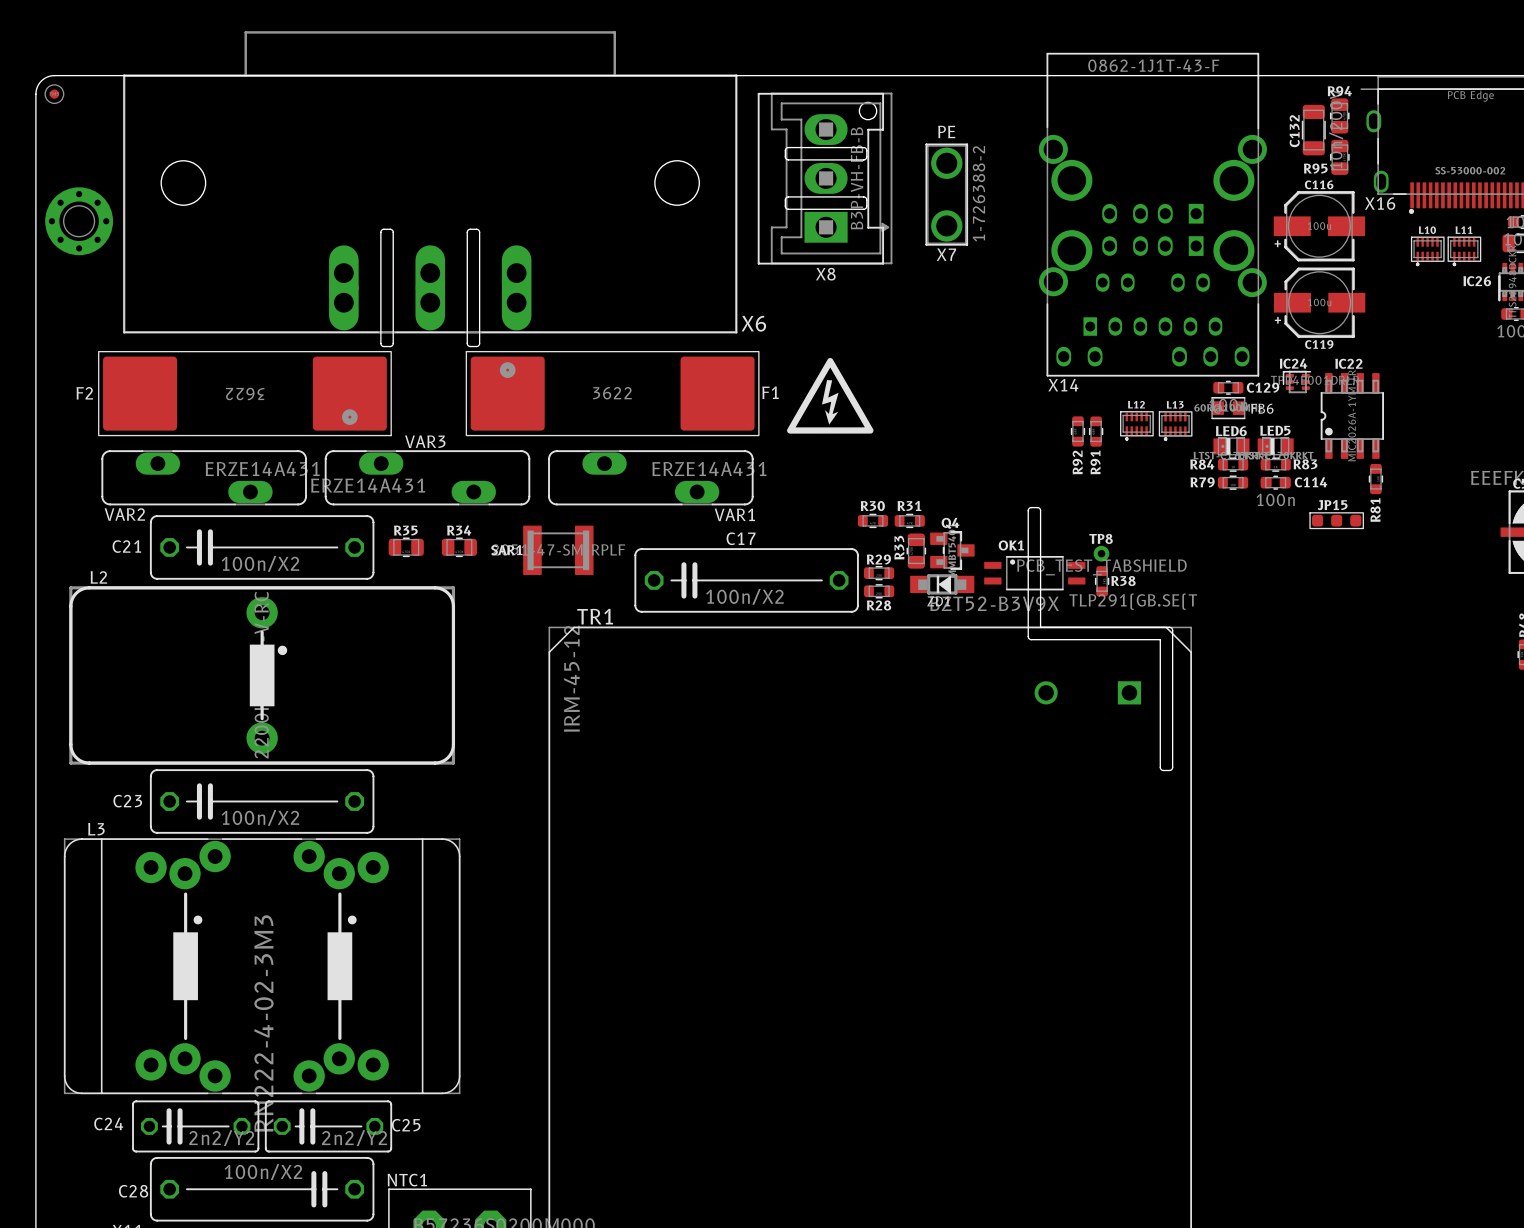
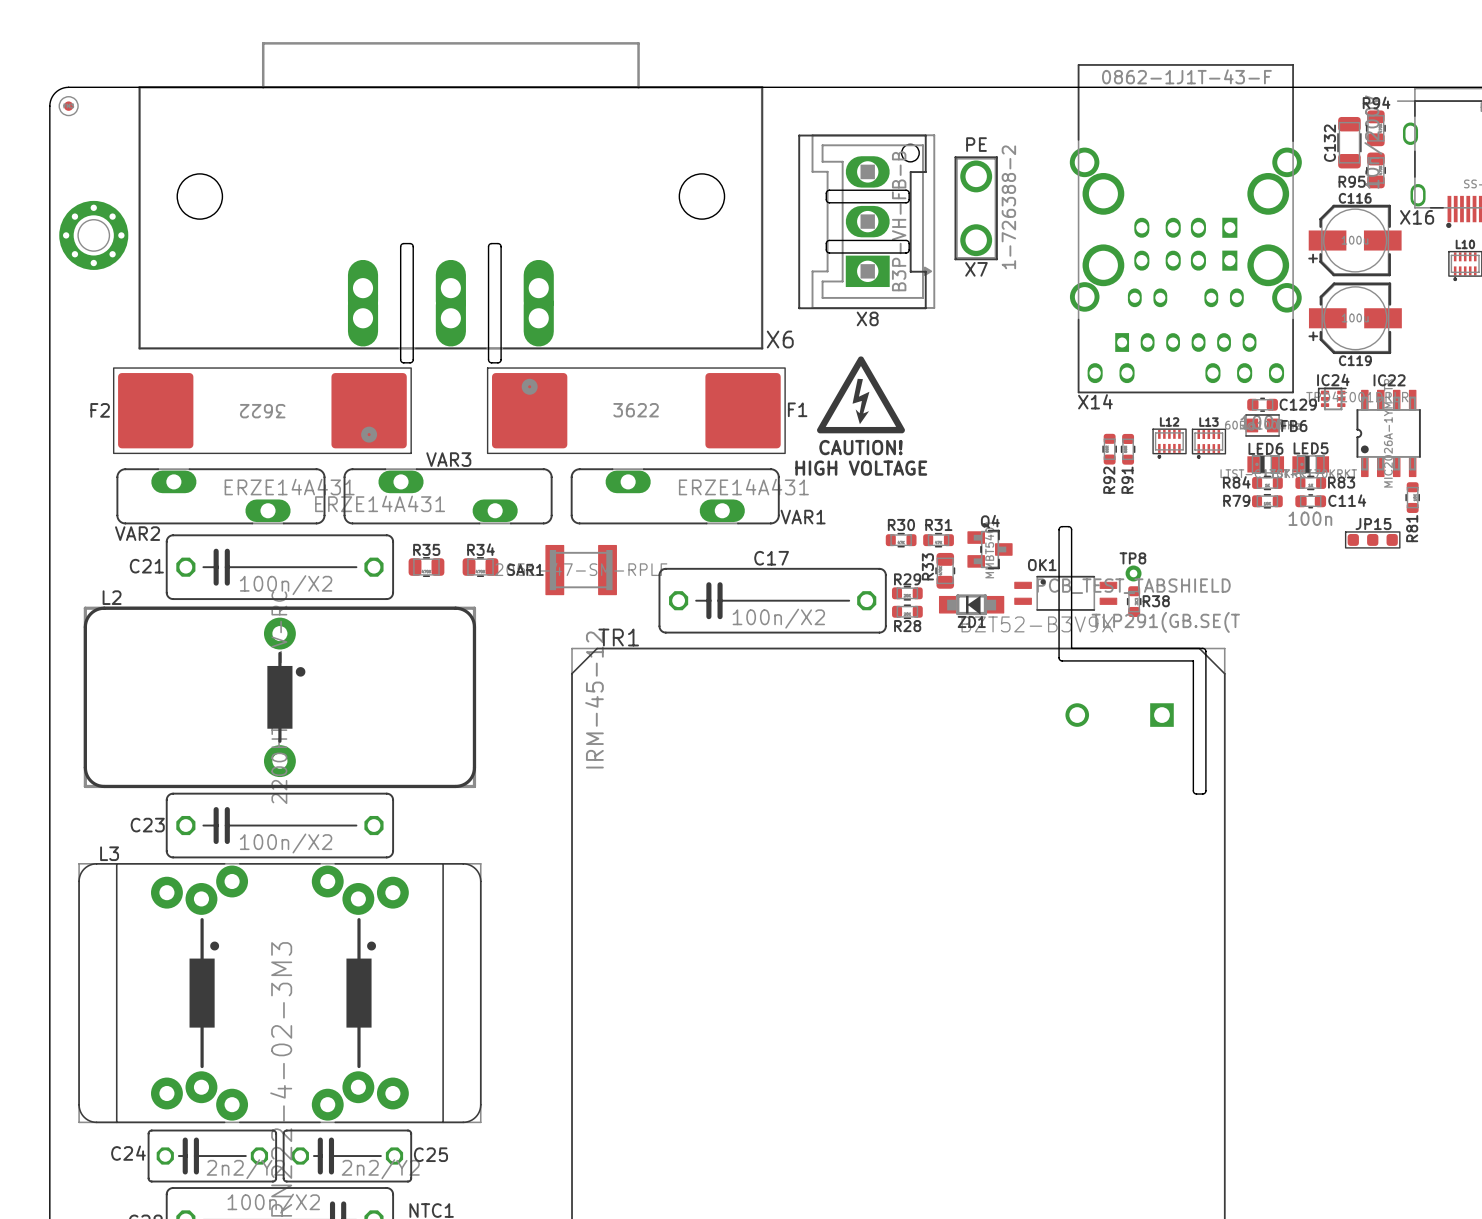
X8 position: (825, 178) -> (866, 221)
drawing position: (830, 395) -> (860, 394)
text: none -> CAUTION! (860, 447)
text: none -> HIGH VOLTAGE (861, 468)
VAR1 name position: VAR1 (734, 514) -> VAR1 (803, 517)
Q4 position: (952, 550) -> (990, 549)

